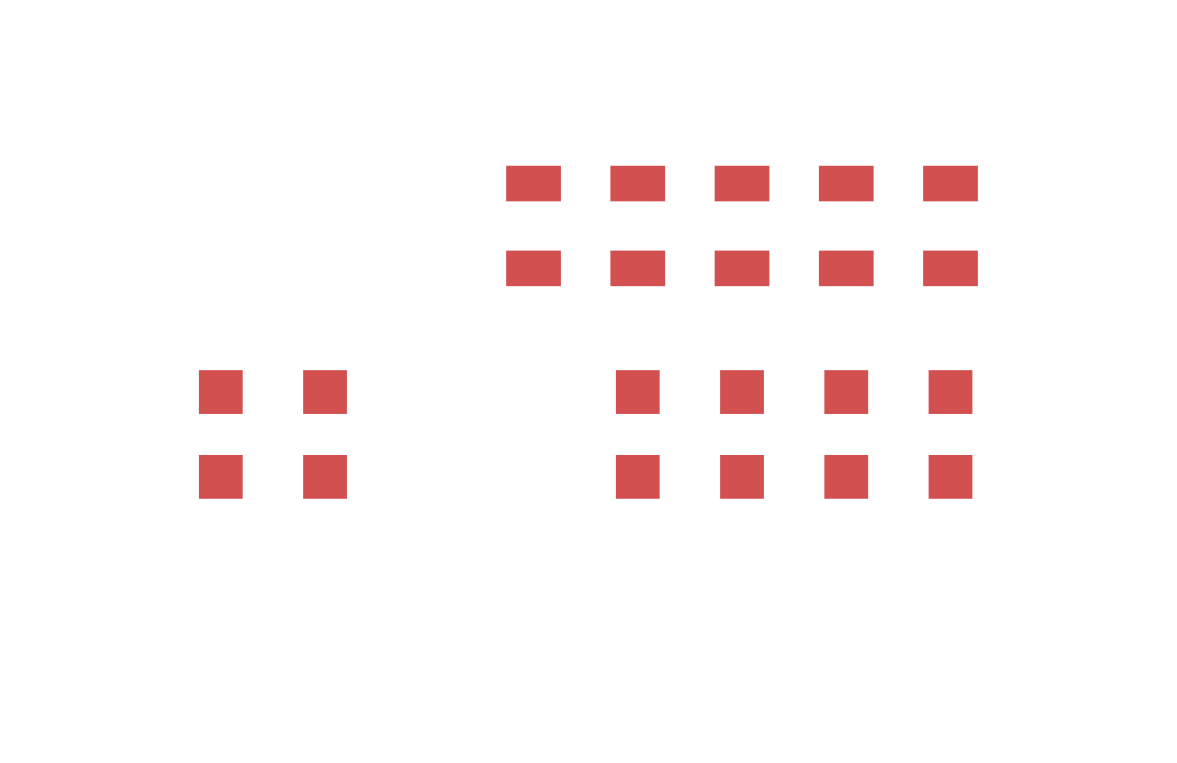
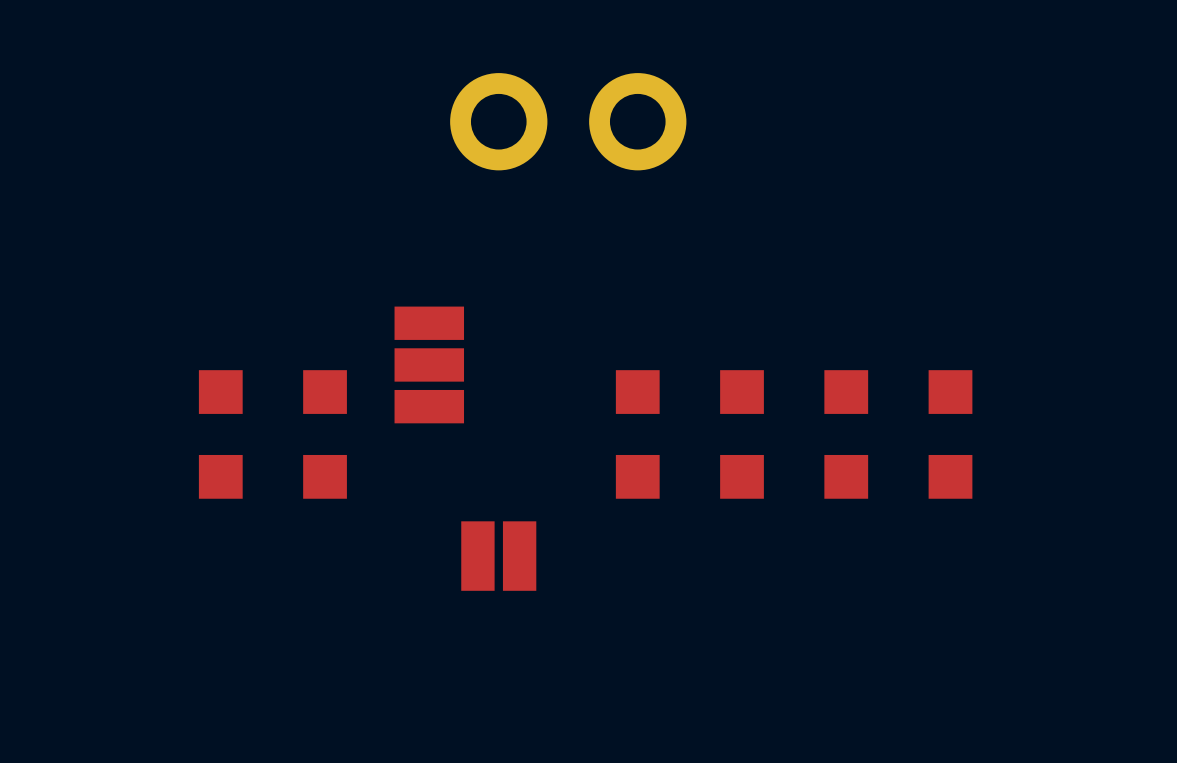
part: none -> (568, 121)
part: (533, 225) -> none
part: (637, 225) -> none
part: (742, 225) -> none
part: (846, 225) -> none
part: (950, 225) -> none
part: none -> (429, 364)
part: none -> (498, 556)

